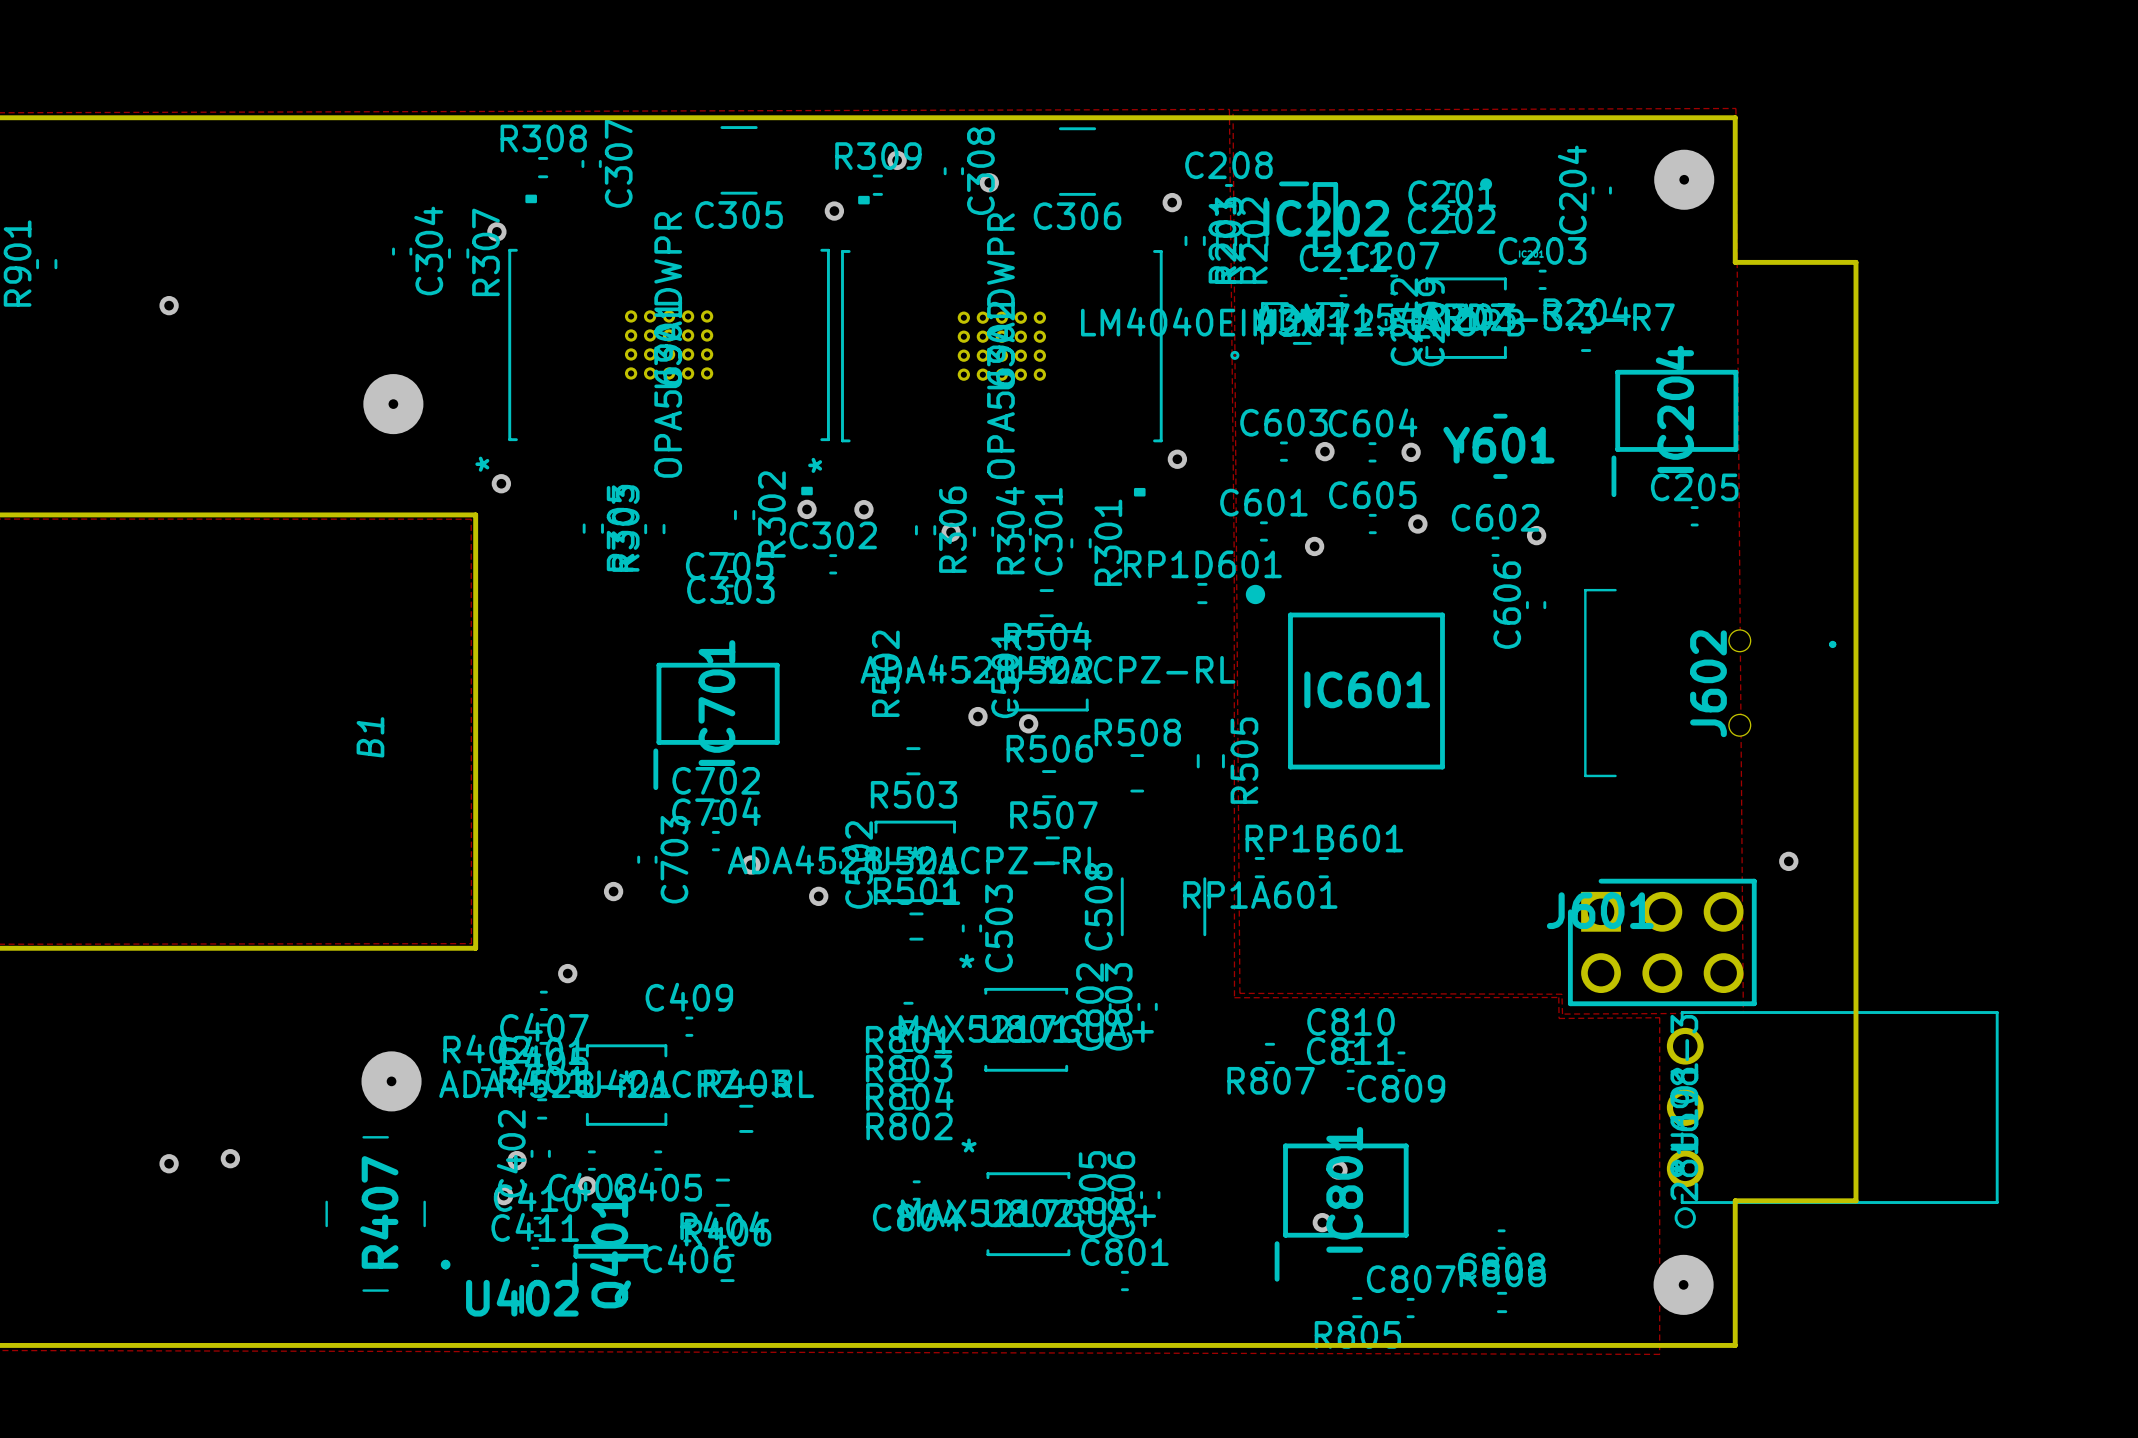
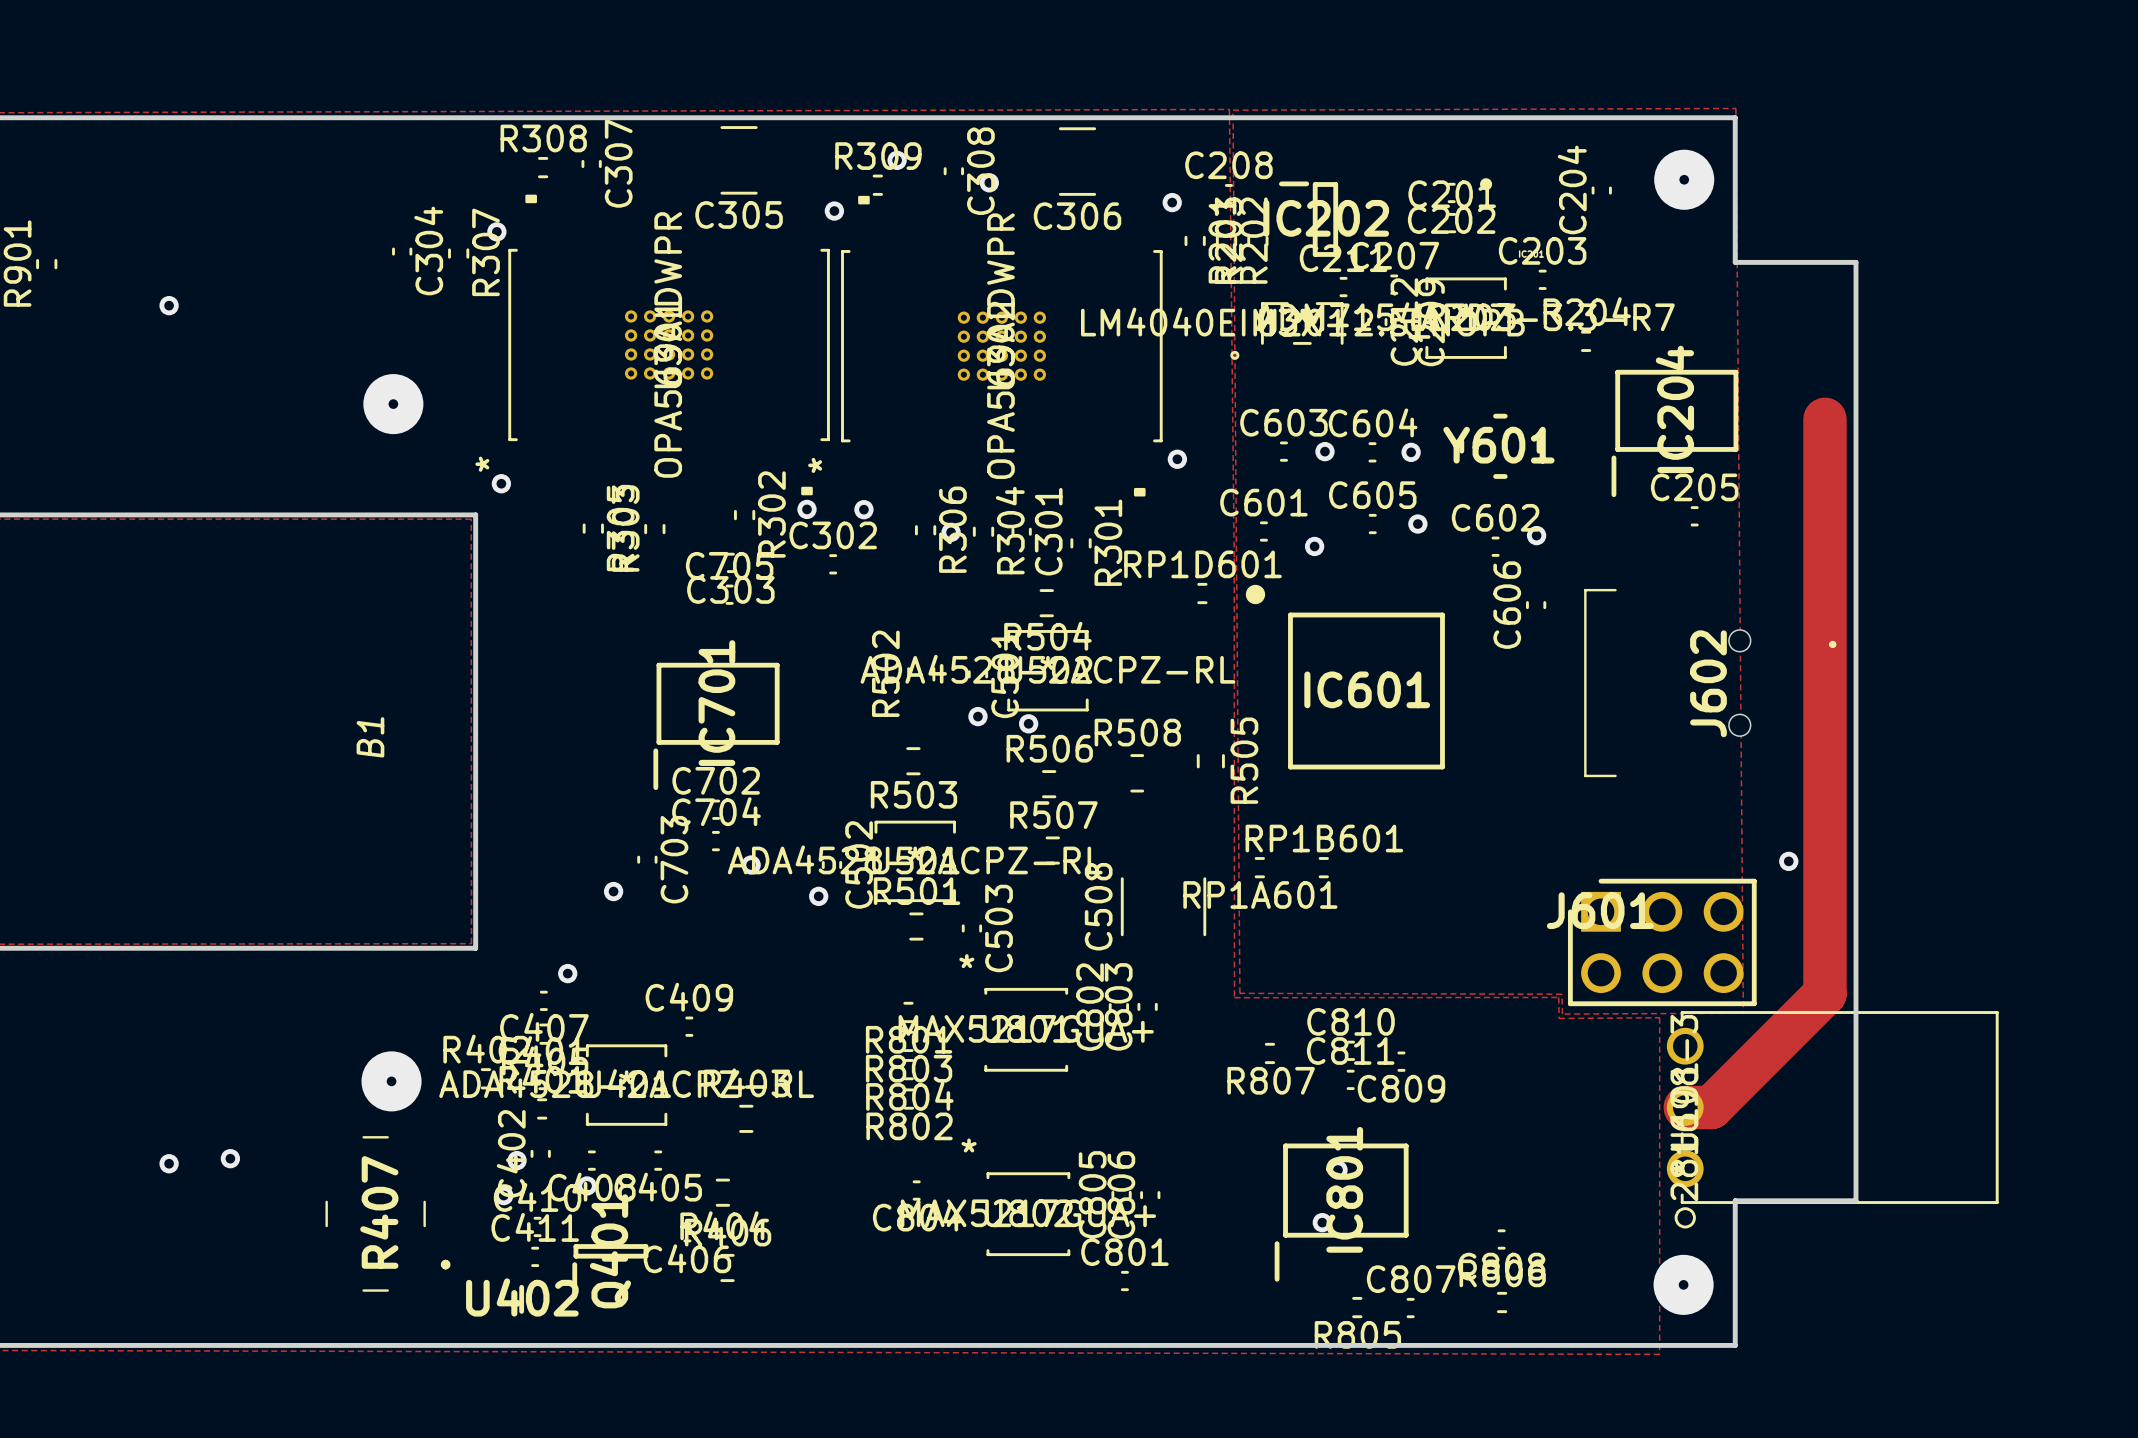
track: none -> (1824, 419) (1824, 993) (1711, 1107) (1685, 1107)

